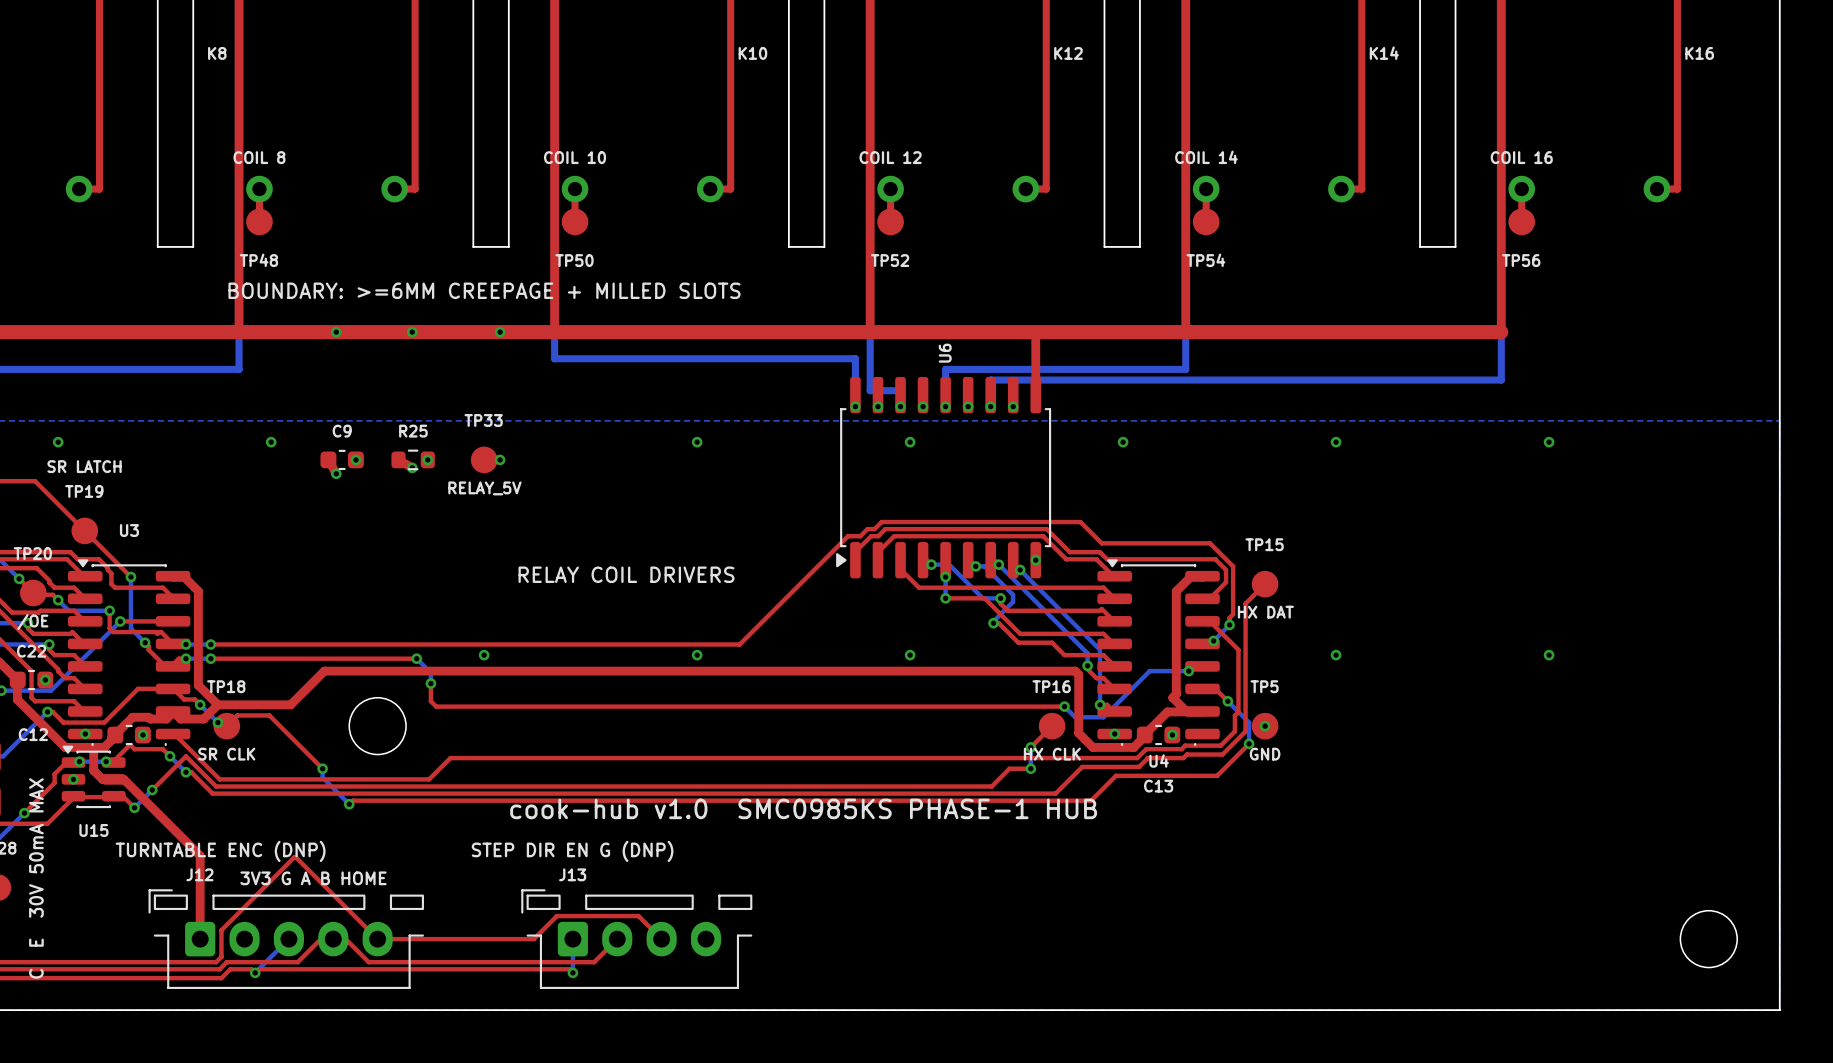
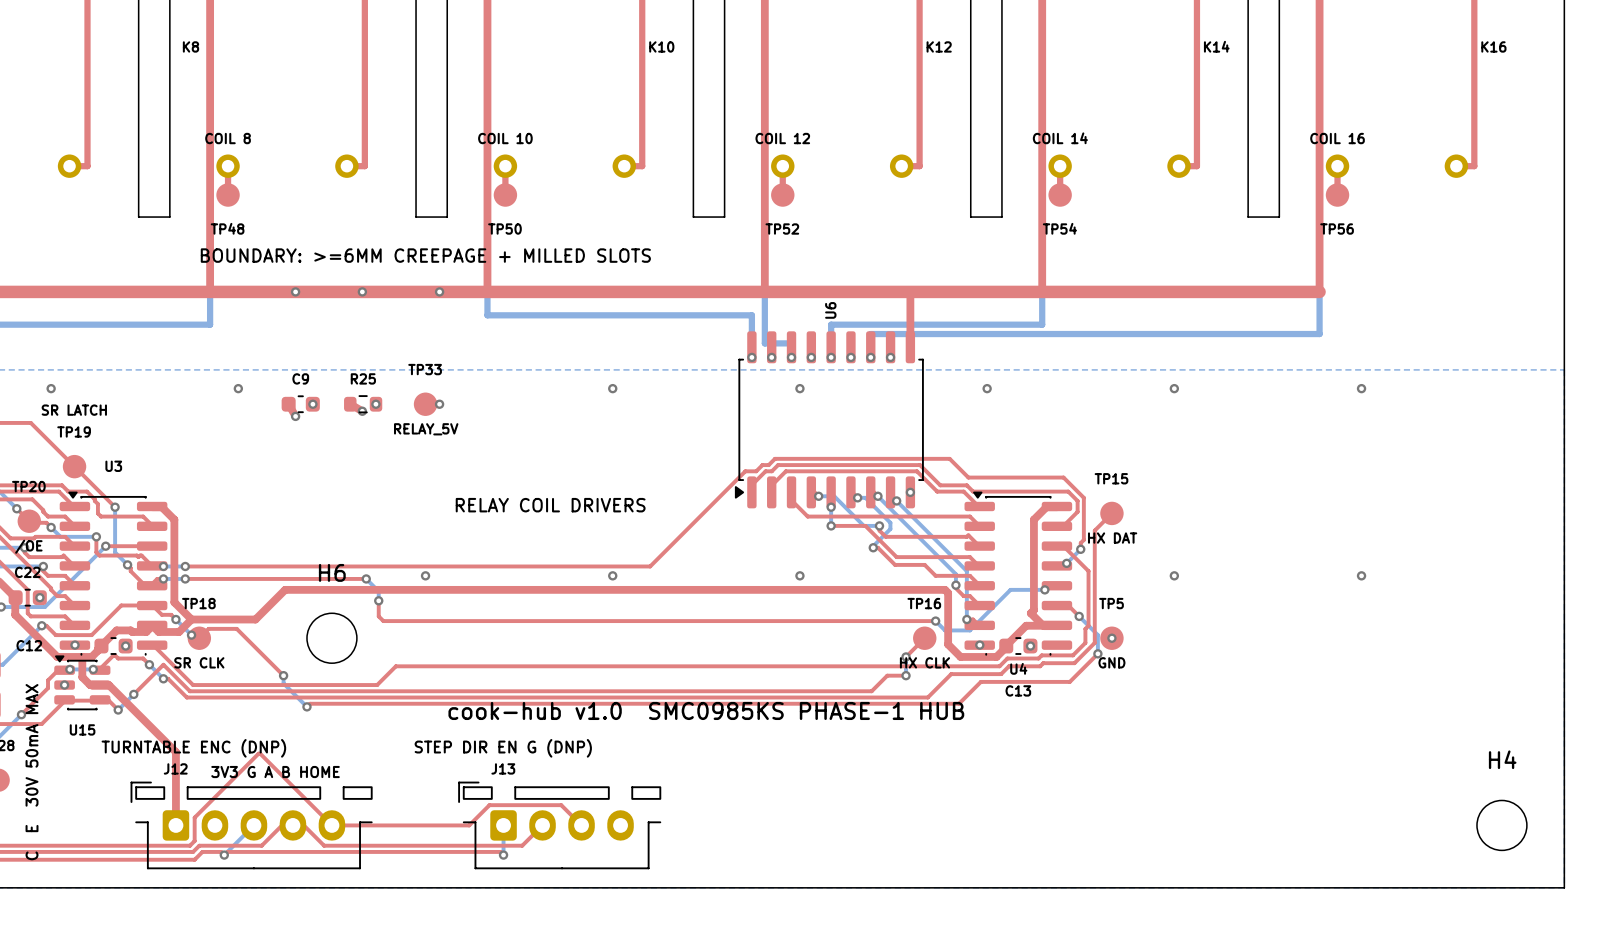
H6 name: none -> H6 (332, 572)
H4 name: none -> H4 (1502, 759)

